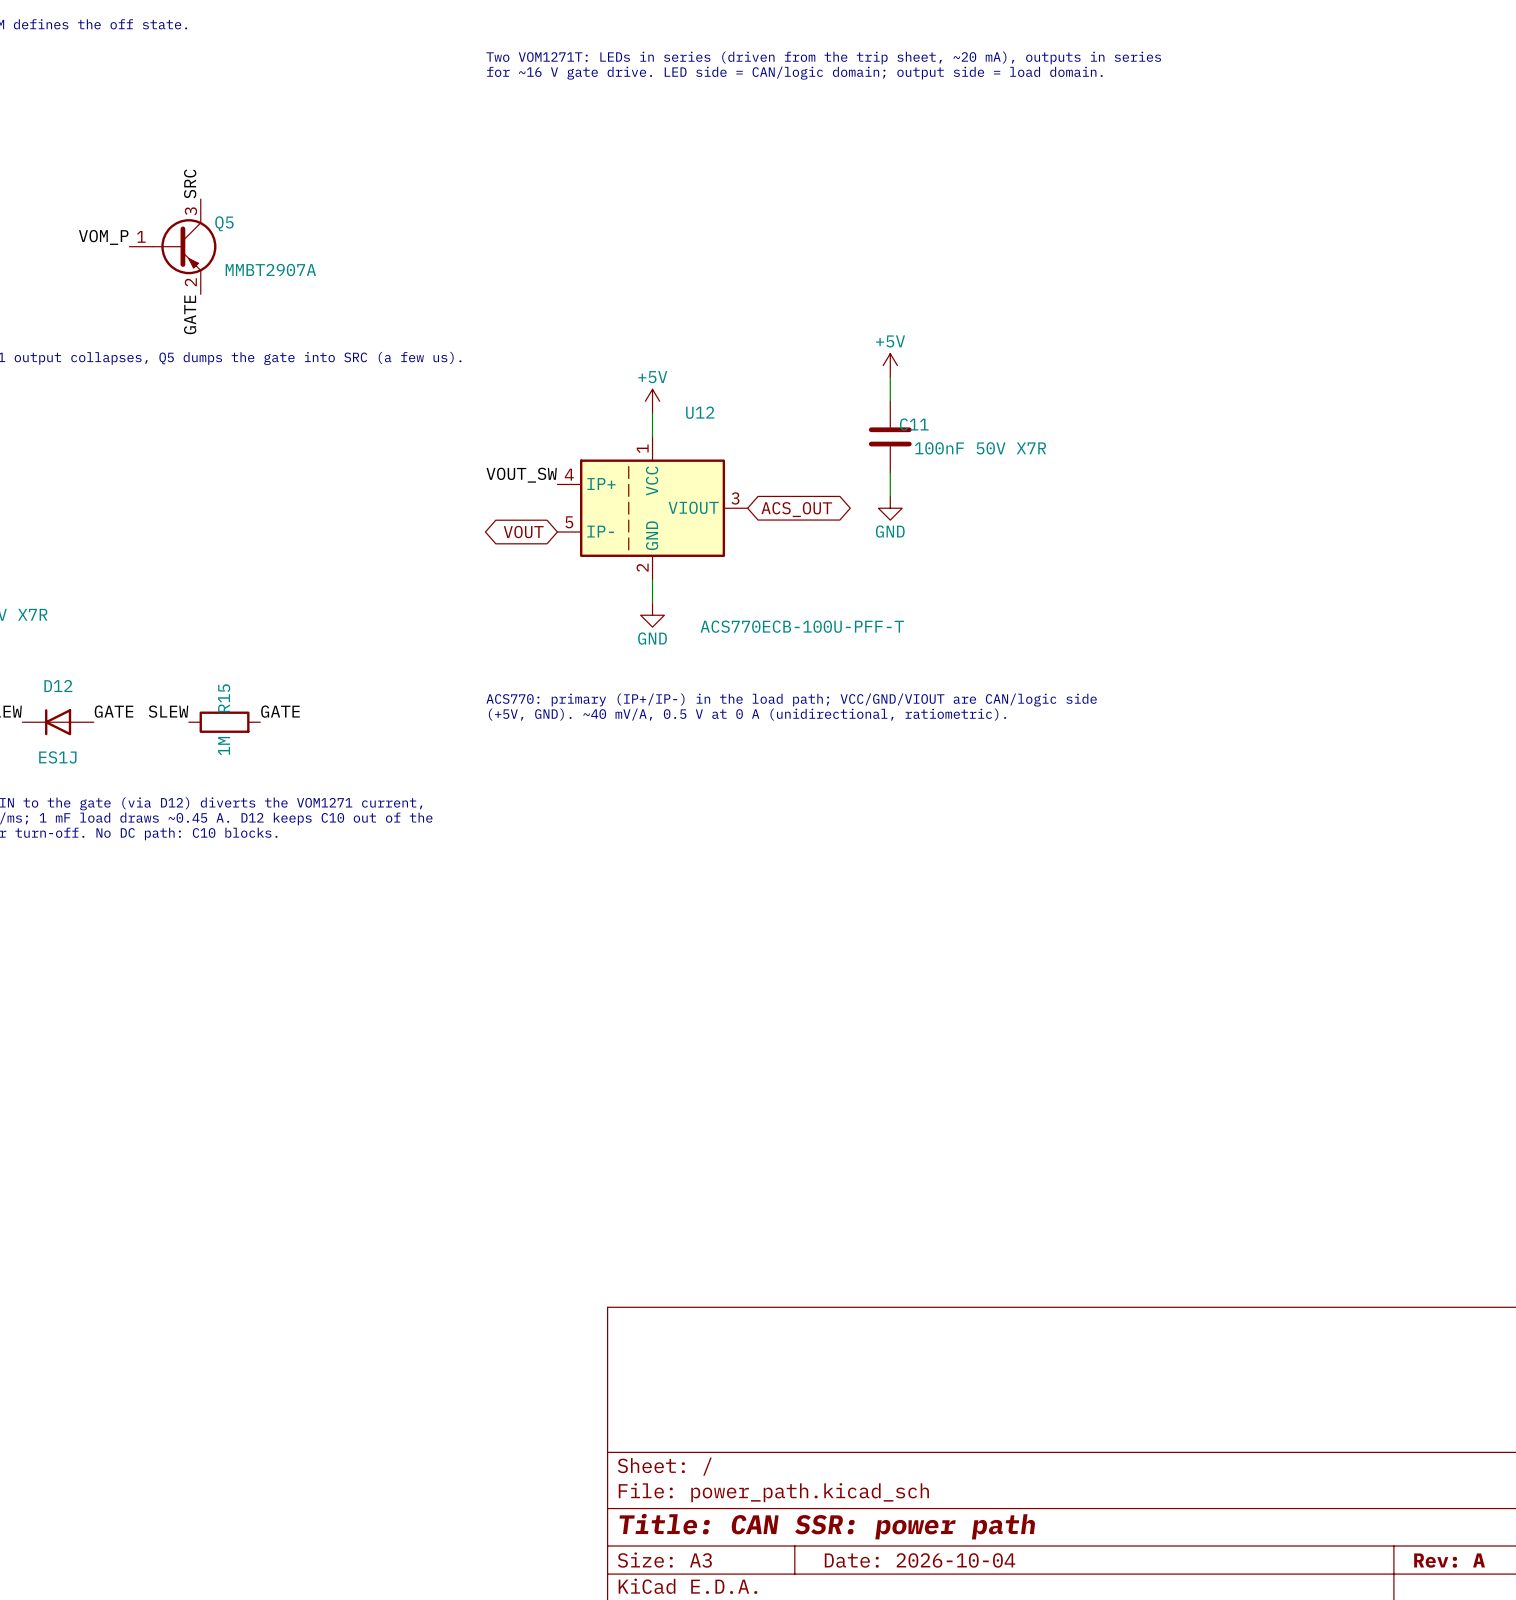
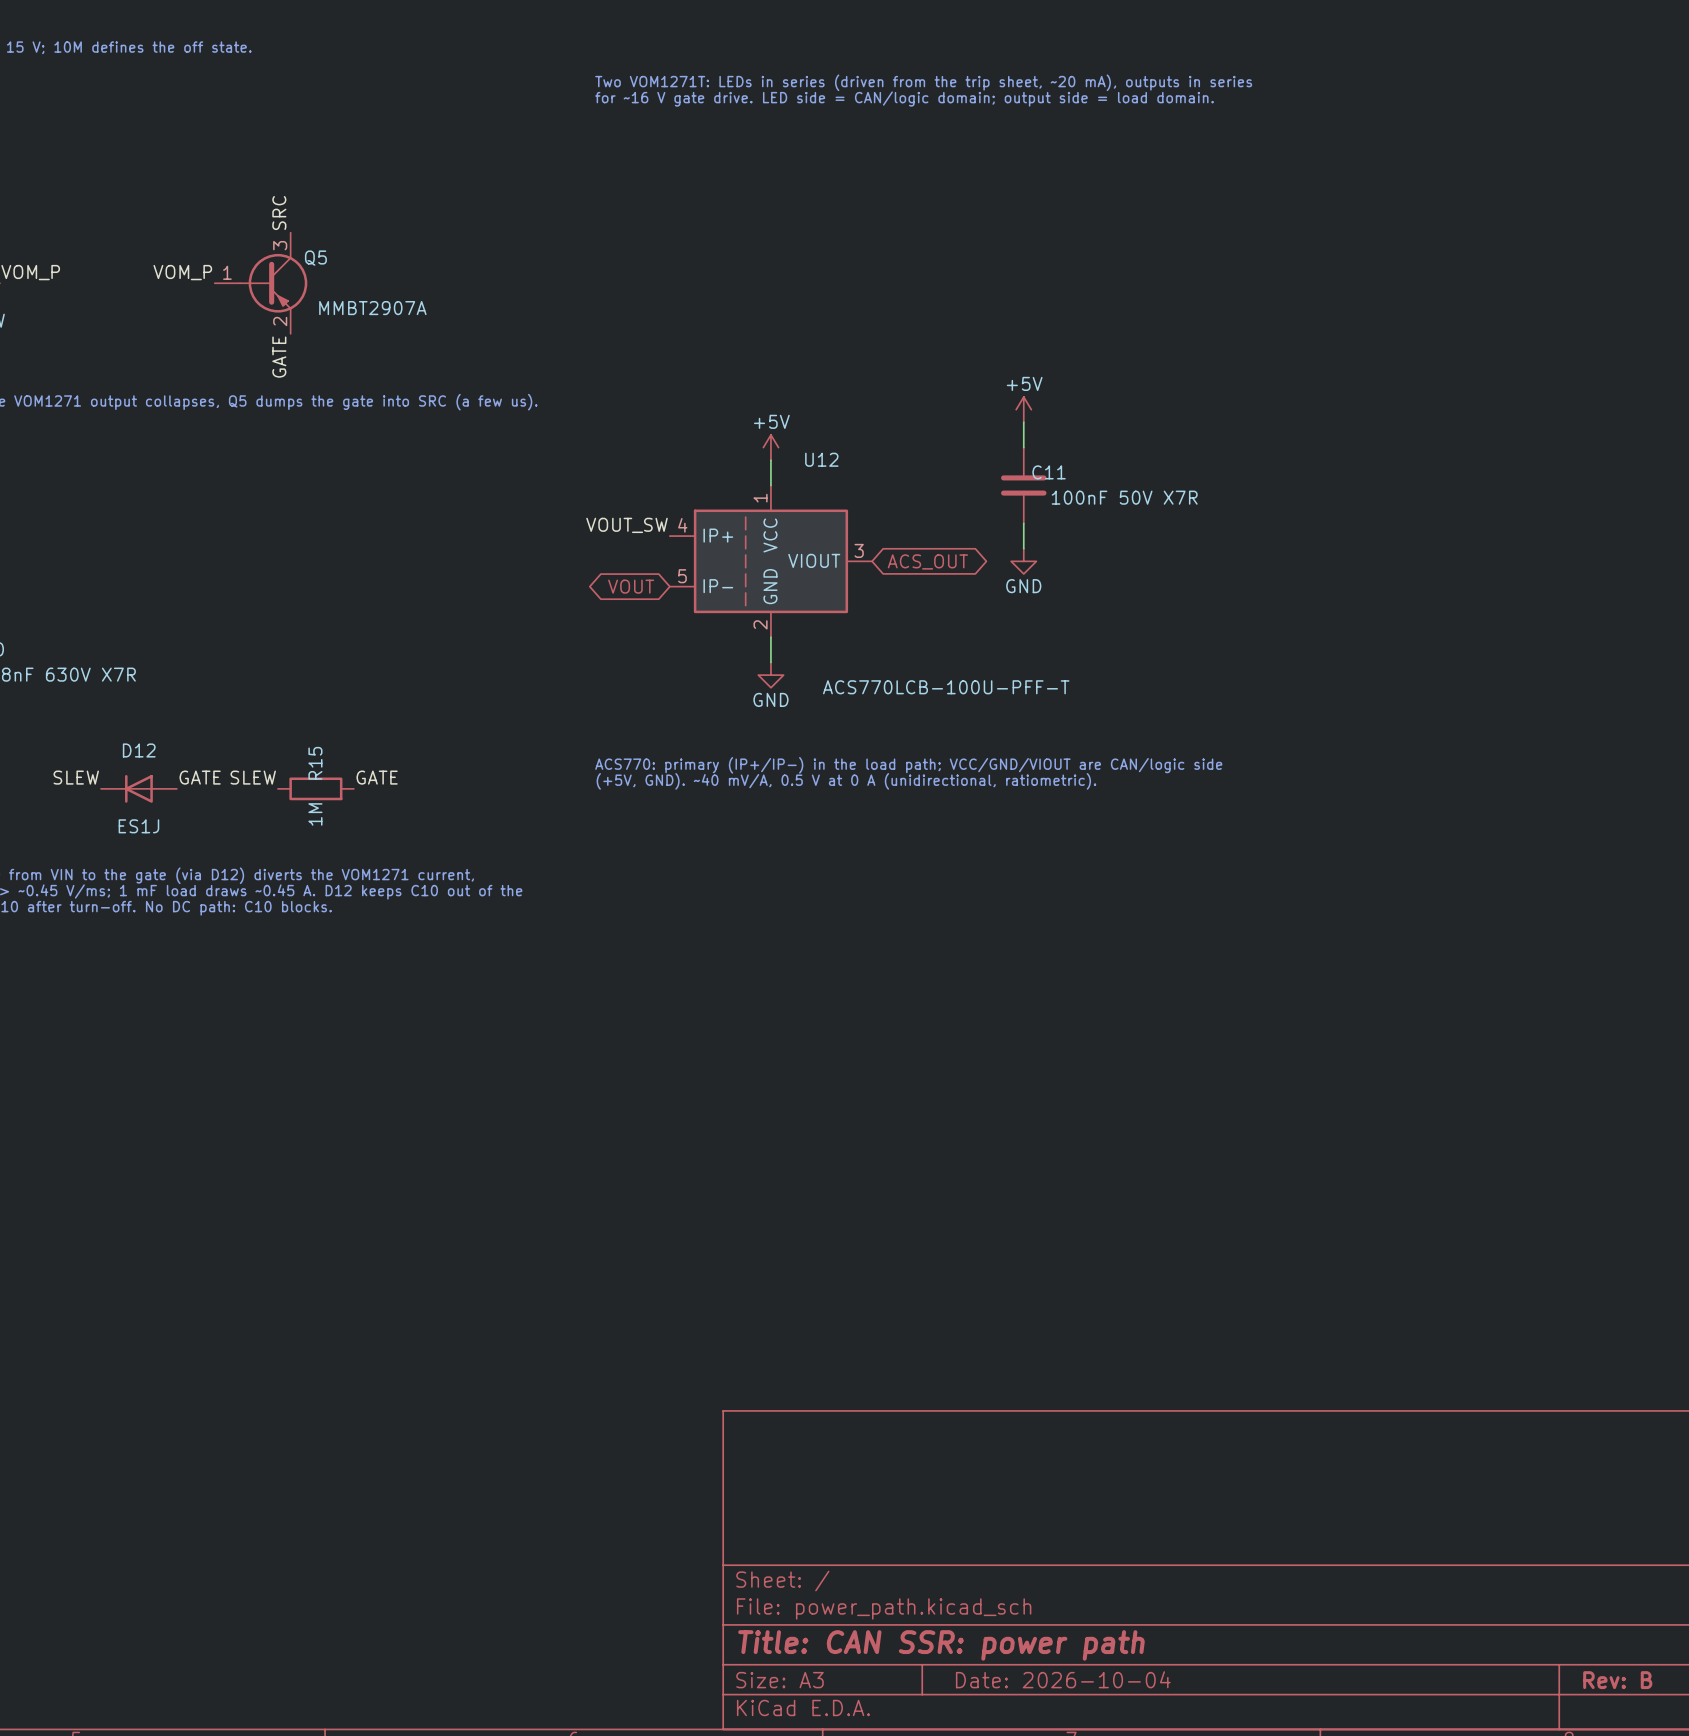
U12 value: ACS770ECB-100U-PFF-T (802, 626) -> ACS770LCB-100U-PFF-T (946, 687)
title block: Rev: A (1449, 1560) -> Rev: B (1617, 1680)

